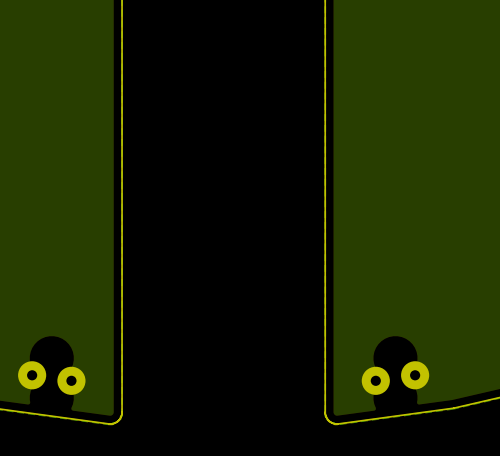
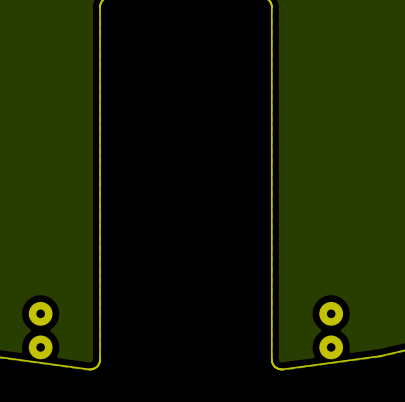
part rotation: 0° (51, 378) -> 82° clockwise (40, 330)
part rotation: 0° (395, 378) -> 82° counterclockwise (331, 330)

